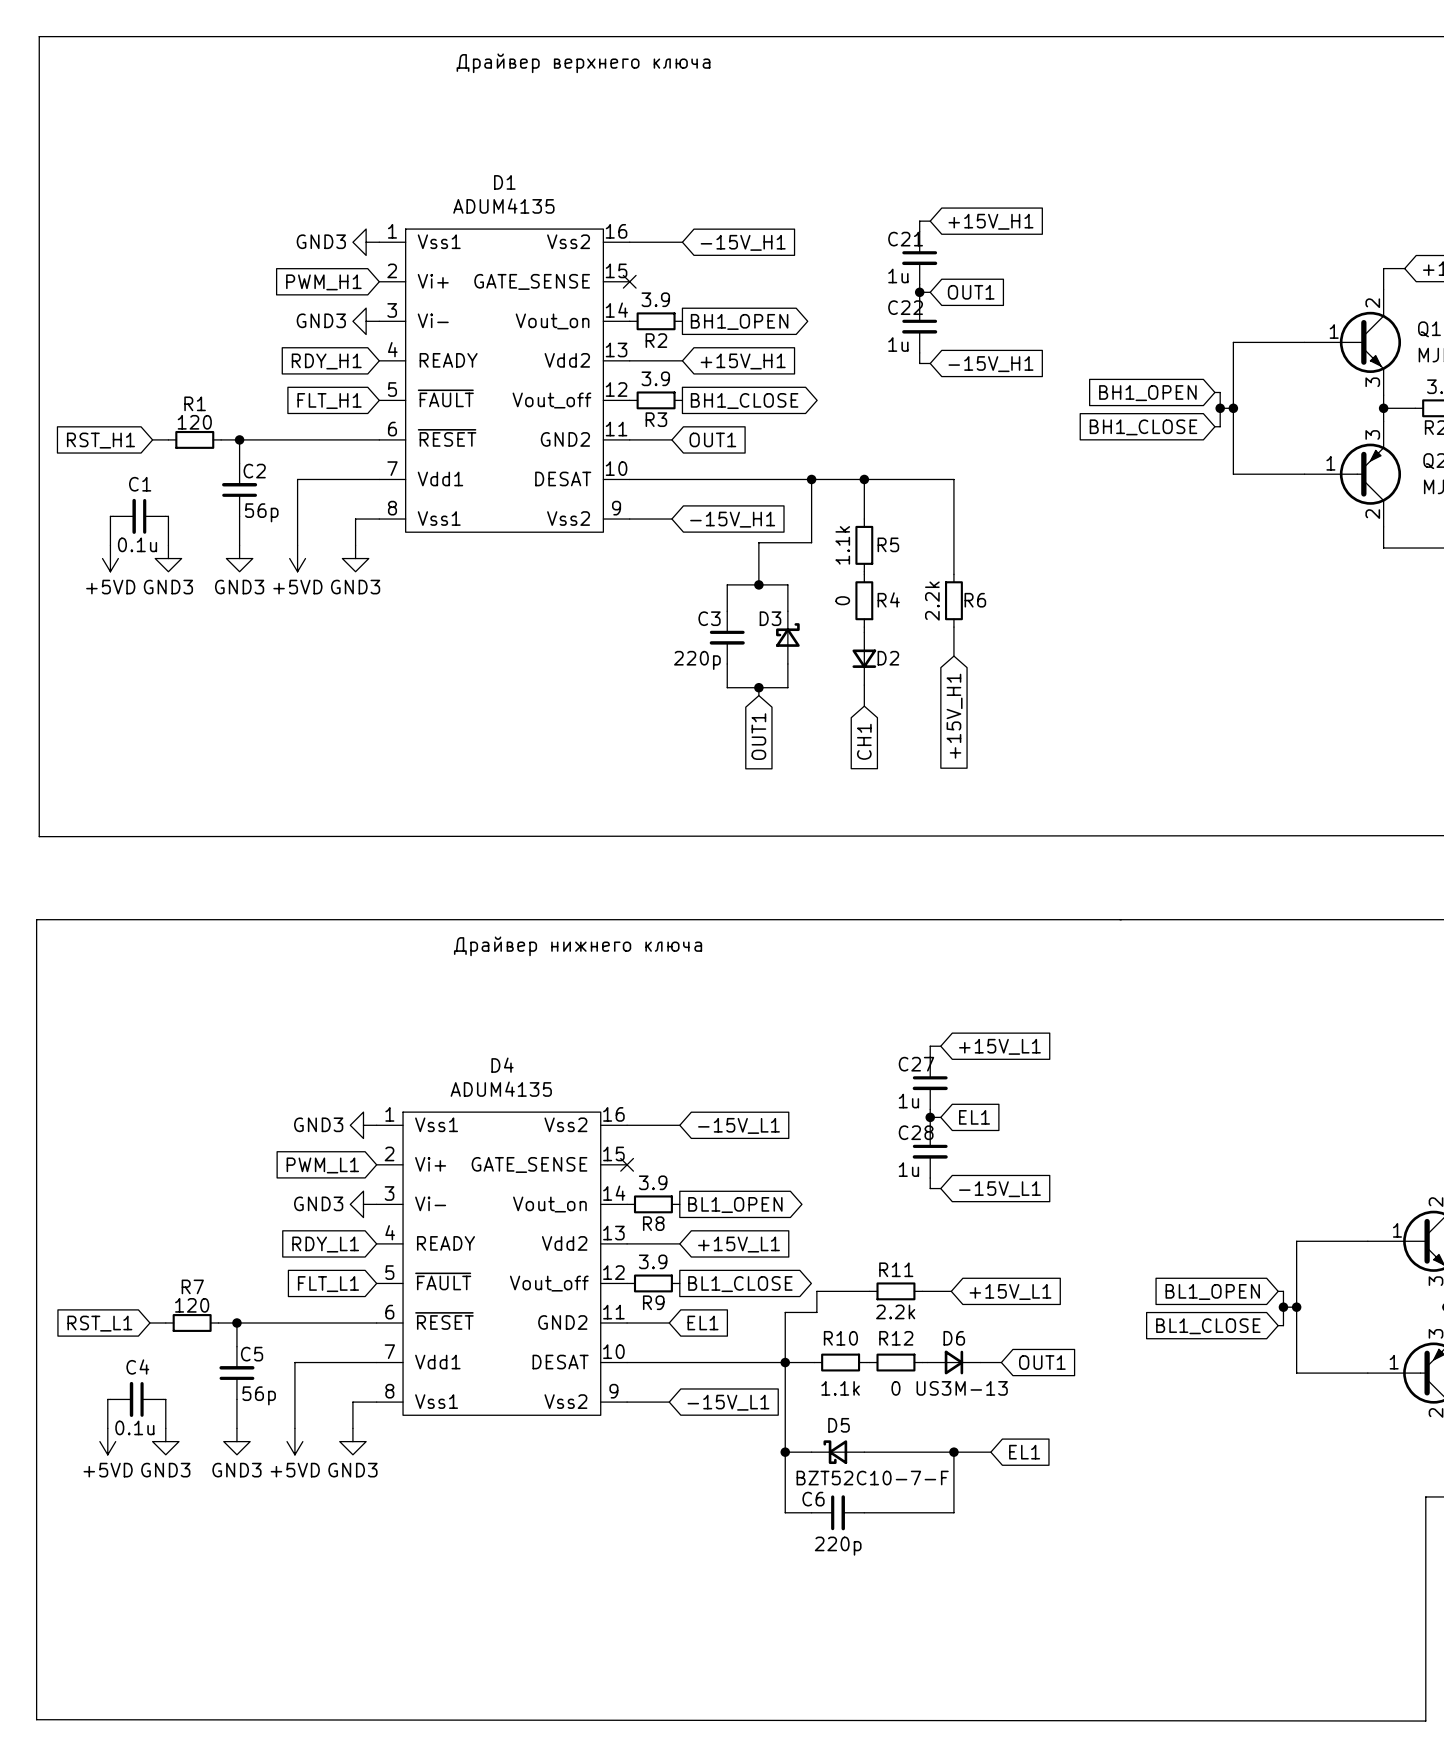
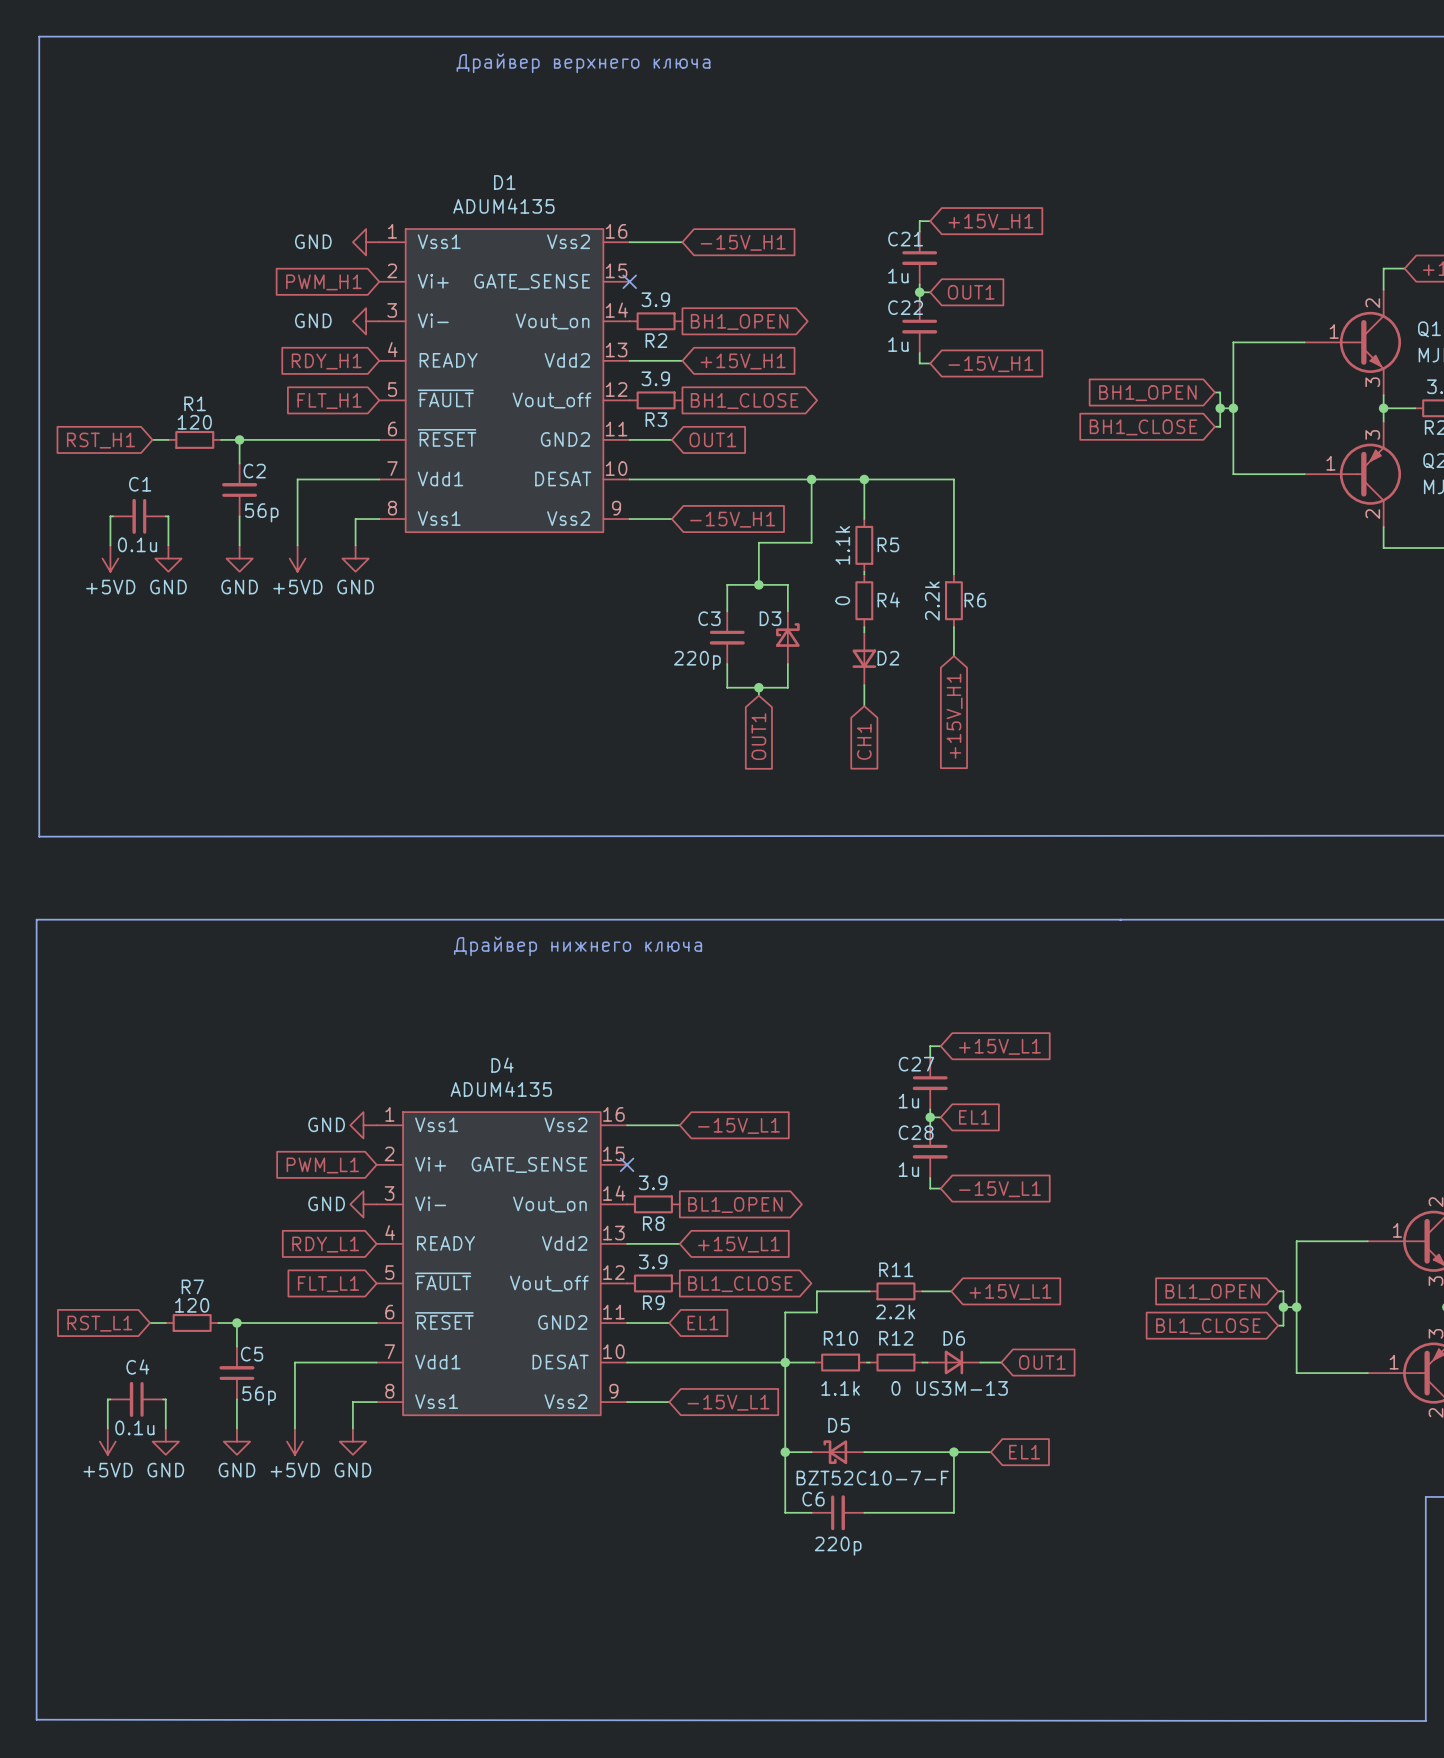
power symbol: GND3 (366, 242) -> GND (366, 242)
power symbol: GND3 (366, 321) -> GND (366, 321)
power symbol: GND3 (168, 558) -> GND (168, 558)
power symbol: GND3 (239, 558) -> GND (239, 558)
power symbol: GND3 (355, 558) -> GND (355, 558)
power symbol: GND3 (363, 1125) -> GND (363, 1125)
power symbol: GND3 (363, 1204) -> GND (363, 1204)
power symbol: GND3 (165, 1441) -> GND (165, 1441)
power symbol: GND3 (236, 1441) -> GND (236, 1441)
power symbol: GND3 (352, 1441) -> GND (352, 1441)

